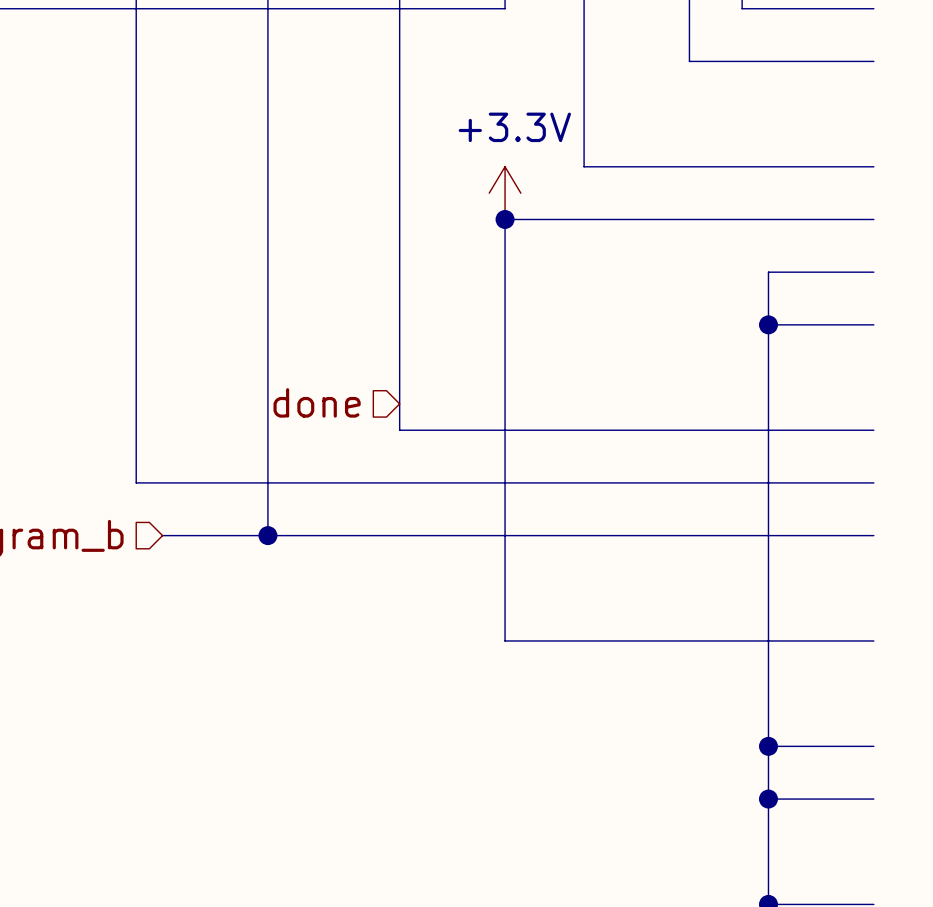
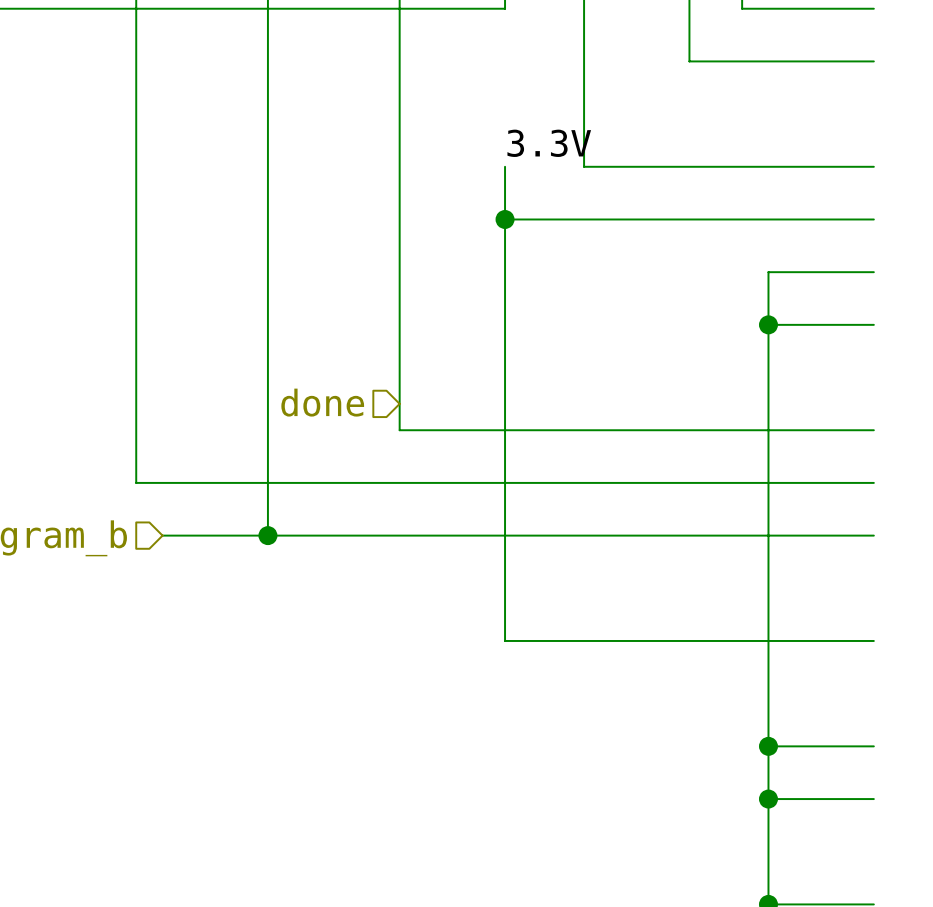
label: none -> 3.3V (549, 143)
power symbol: +3.3V (505, 193) -> none

